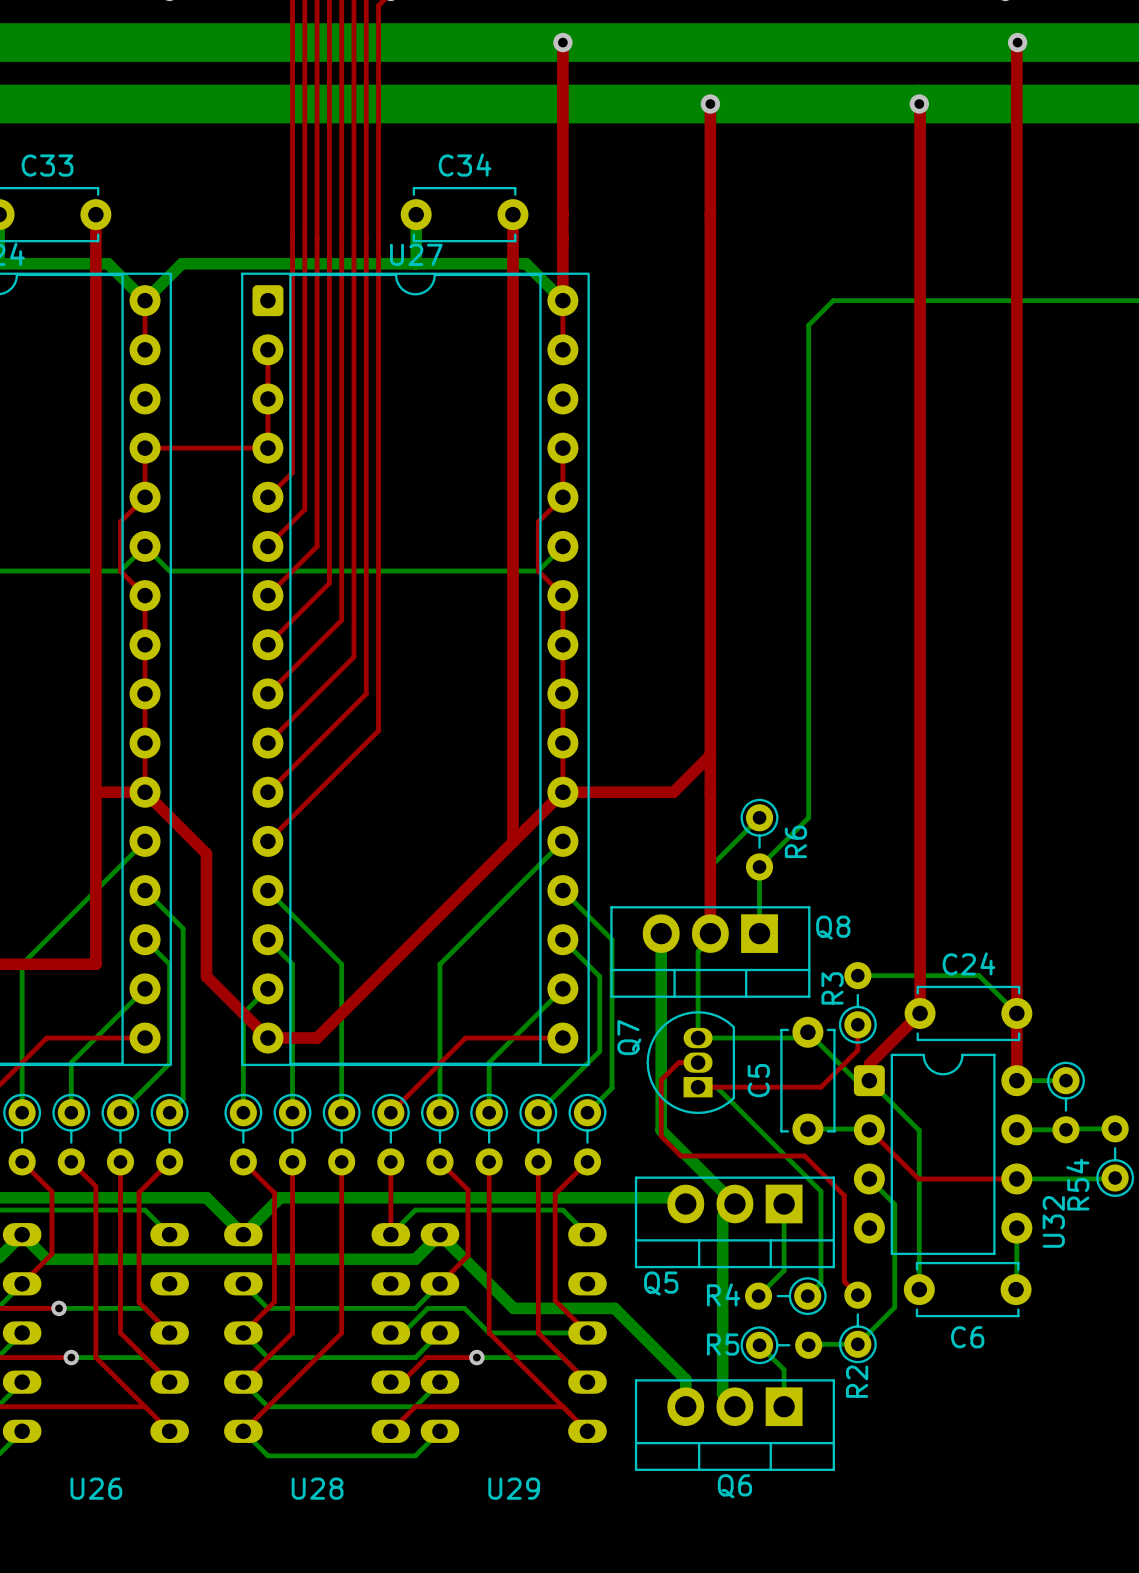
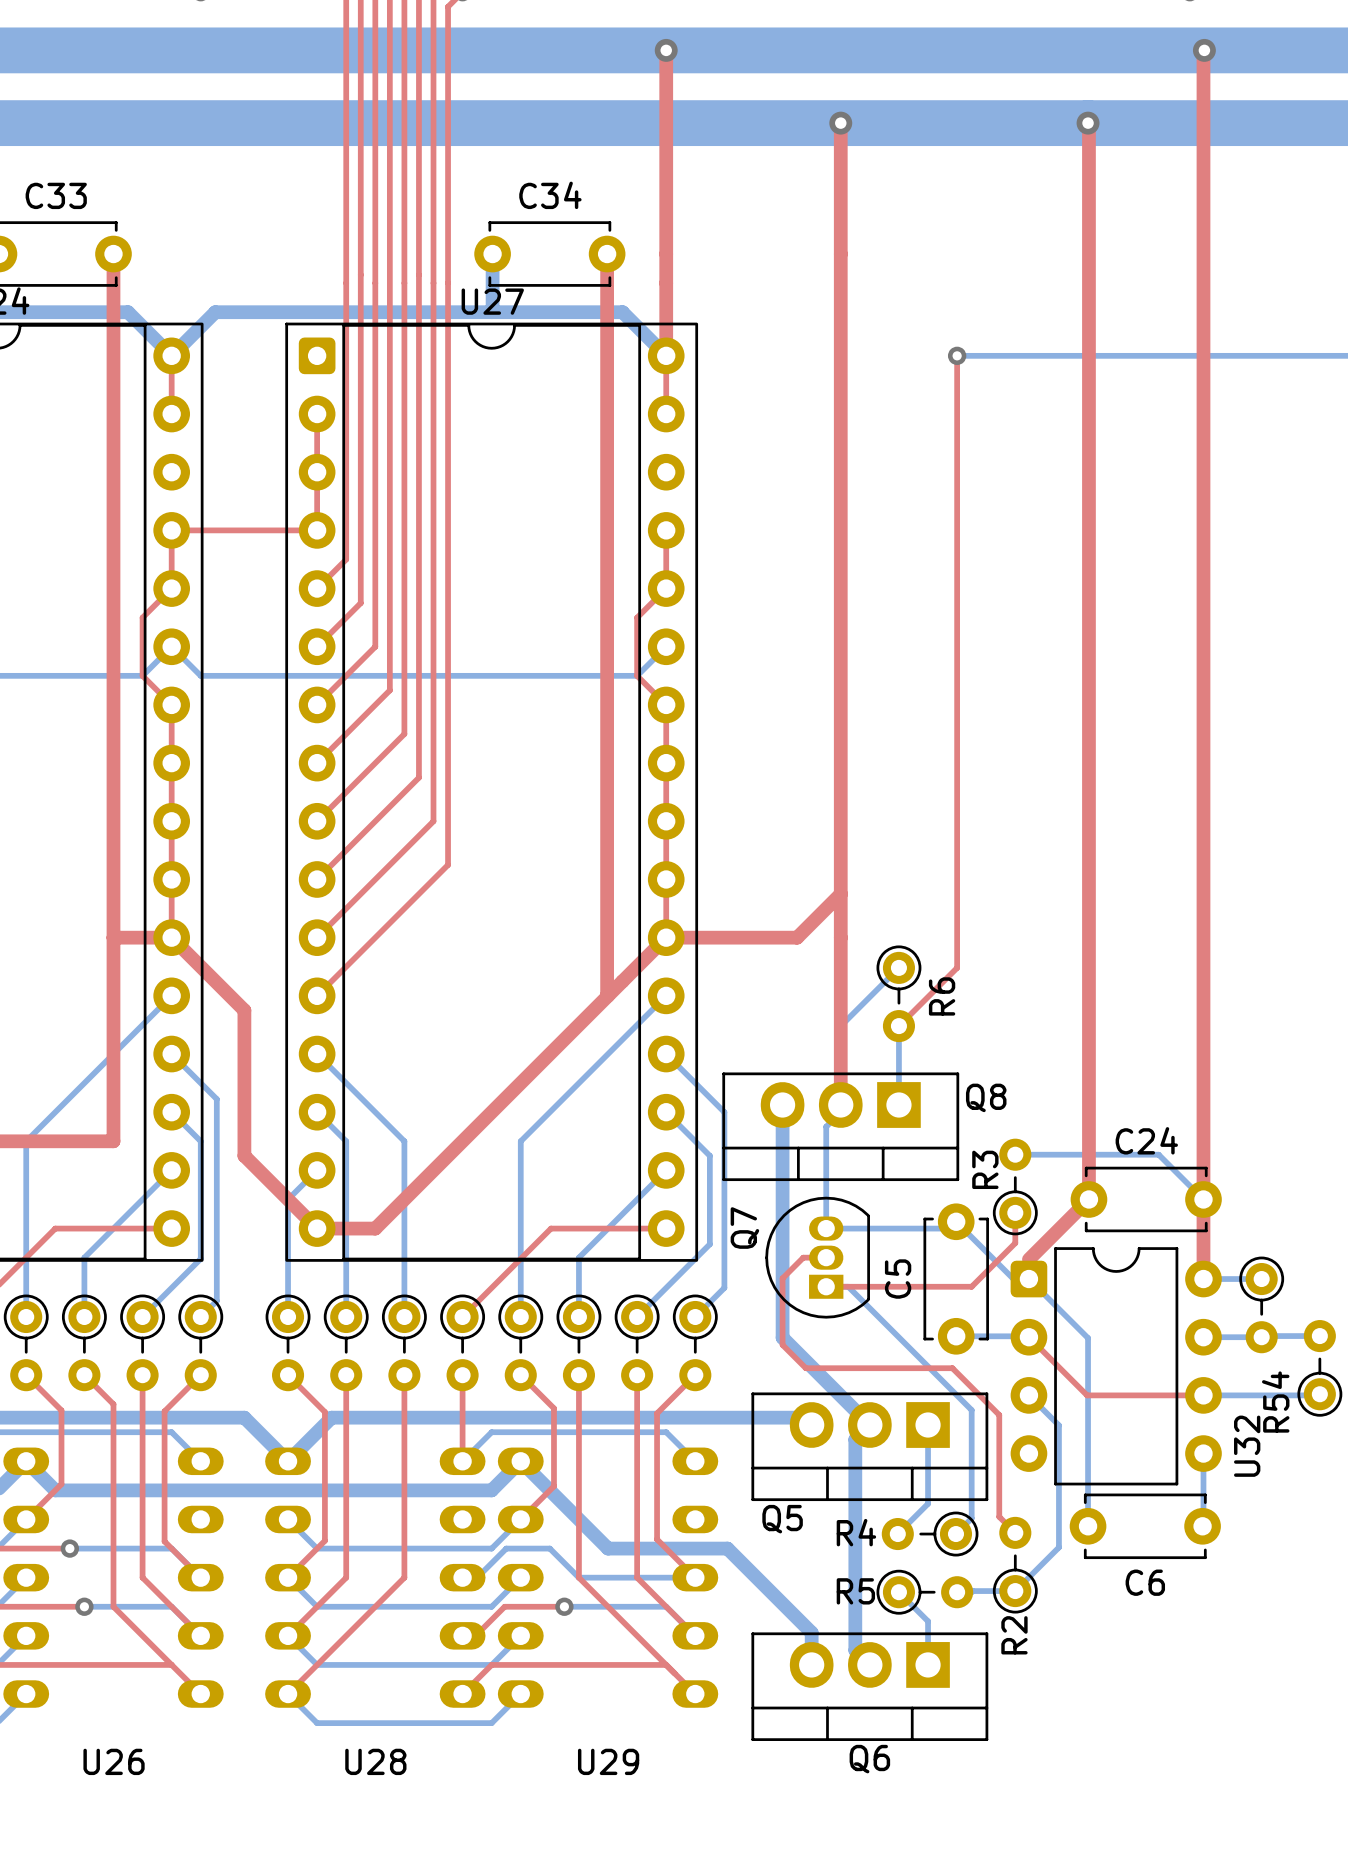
top track: none -> (957, 355) (957, 967) (898, 1026)
via: none -> (957, 355)
bottom track: (833, 300) (808, 325) (808, 817) (759, 866) -> (986, 355) (957, 355)

